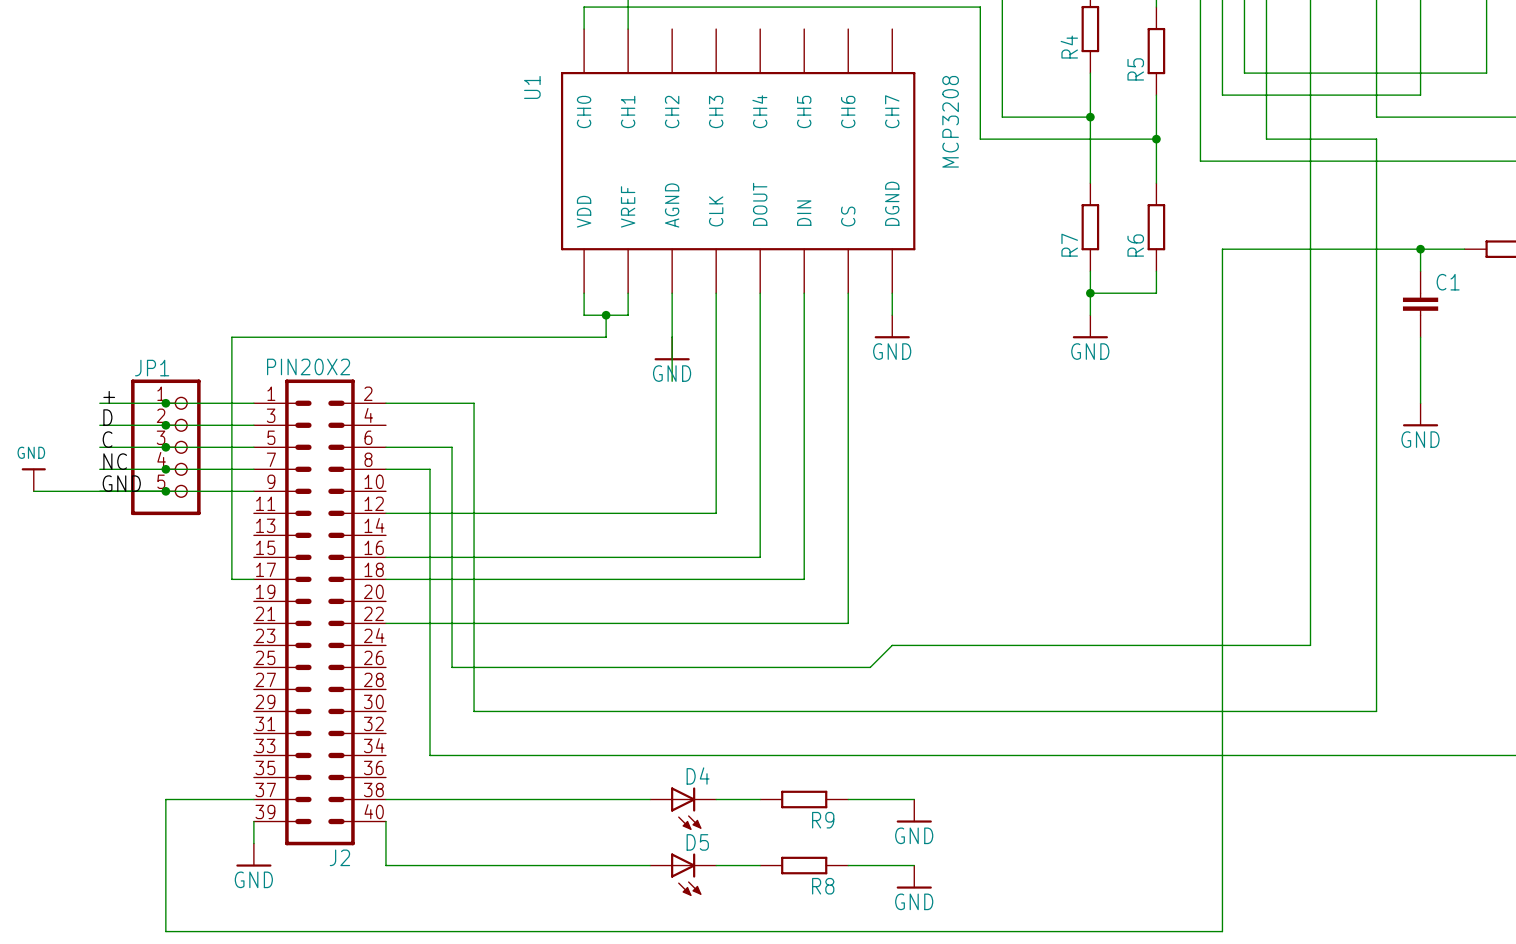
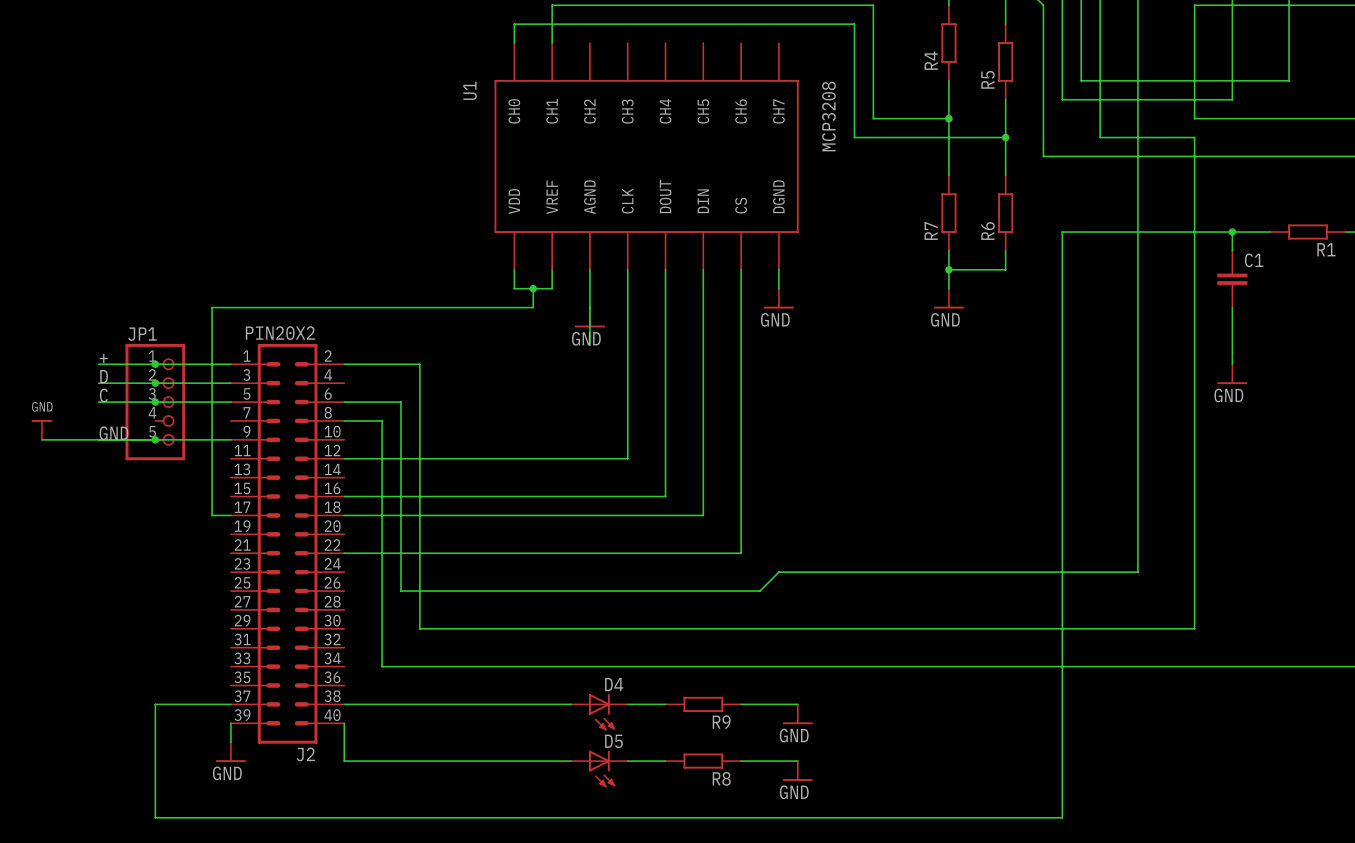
label: NC (115, 461) -> none
wire: (99, 469) (253, 469) -> none
junction: (165, 469) -> none

